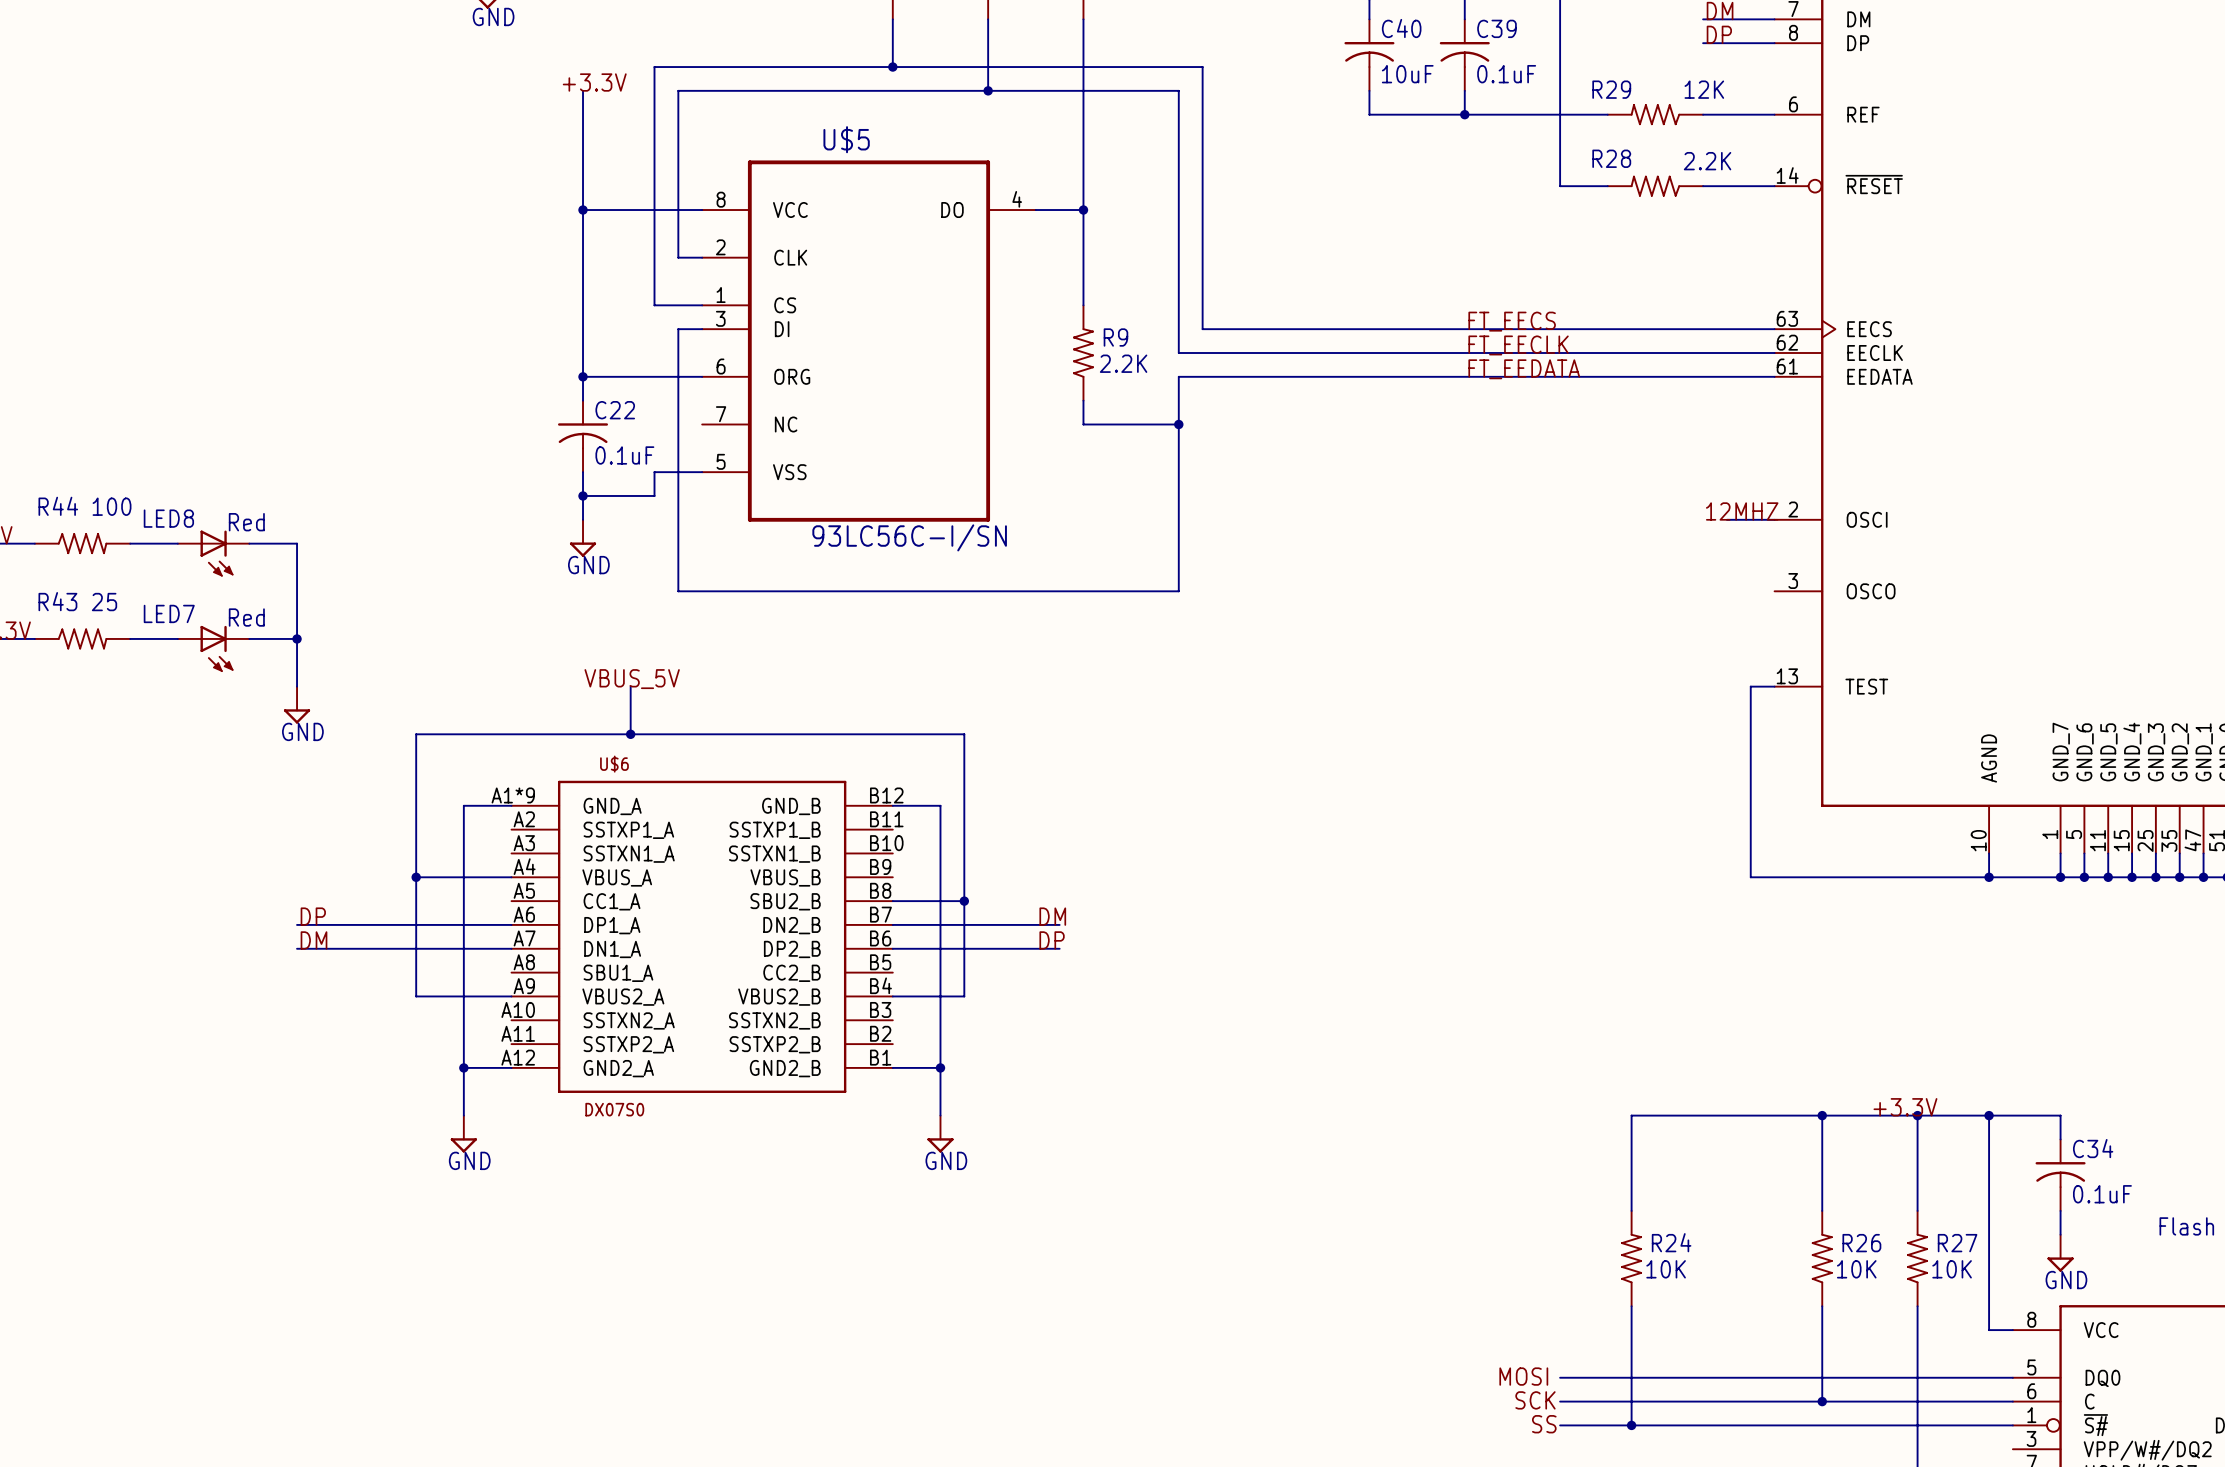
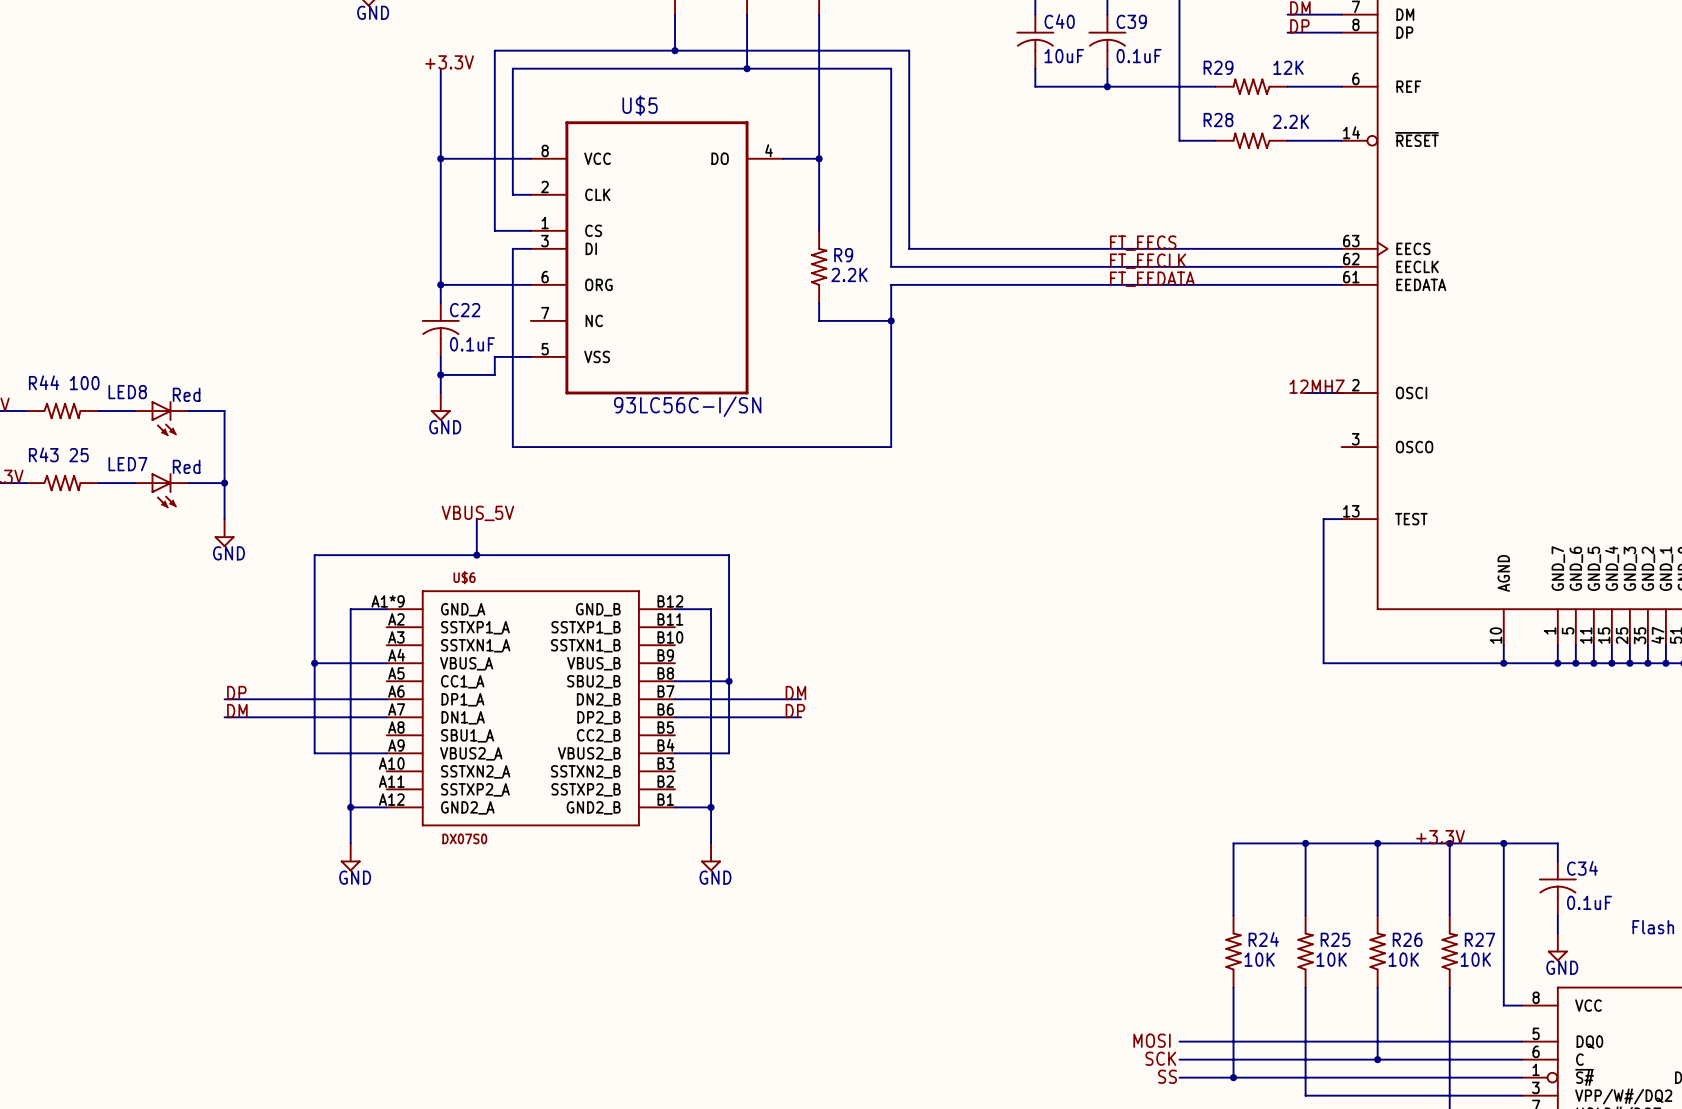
wire: none -> (1305, 843) (1305, 915)
junction: none -> (1305, 843)
R25: none -> 10K (1305, 951)
wire: none -> (1305, 987) (1305, 1095) (1521, 1095)

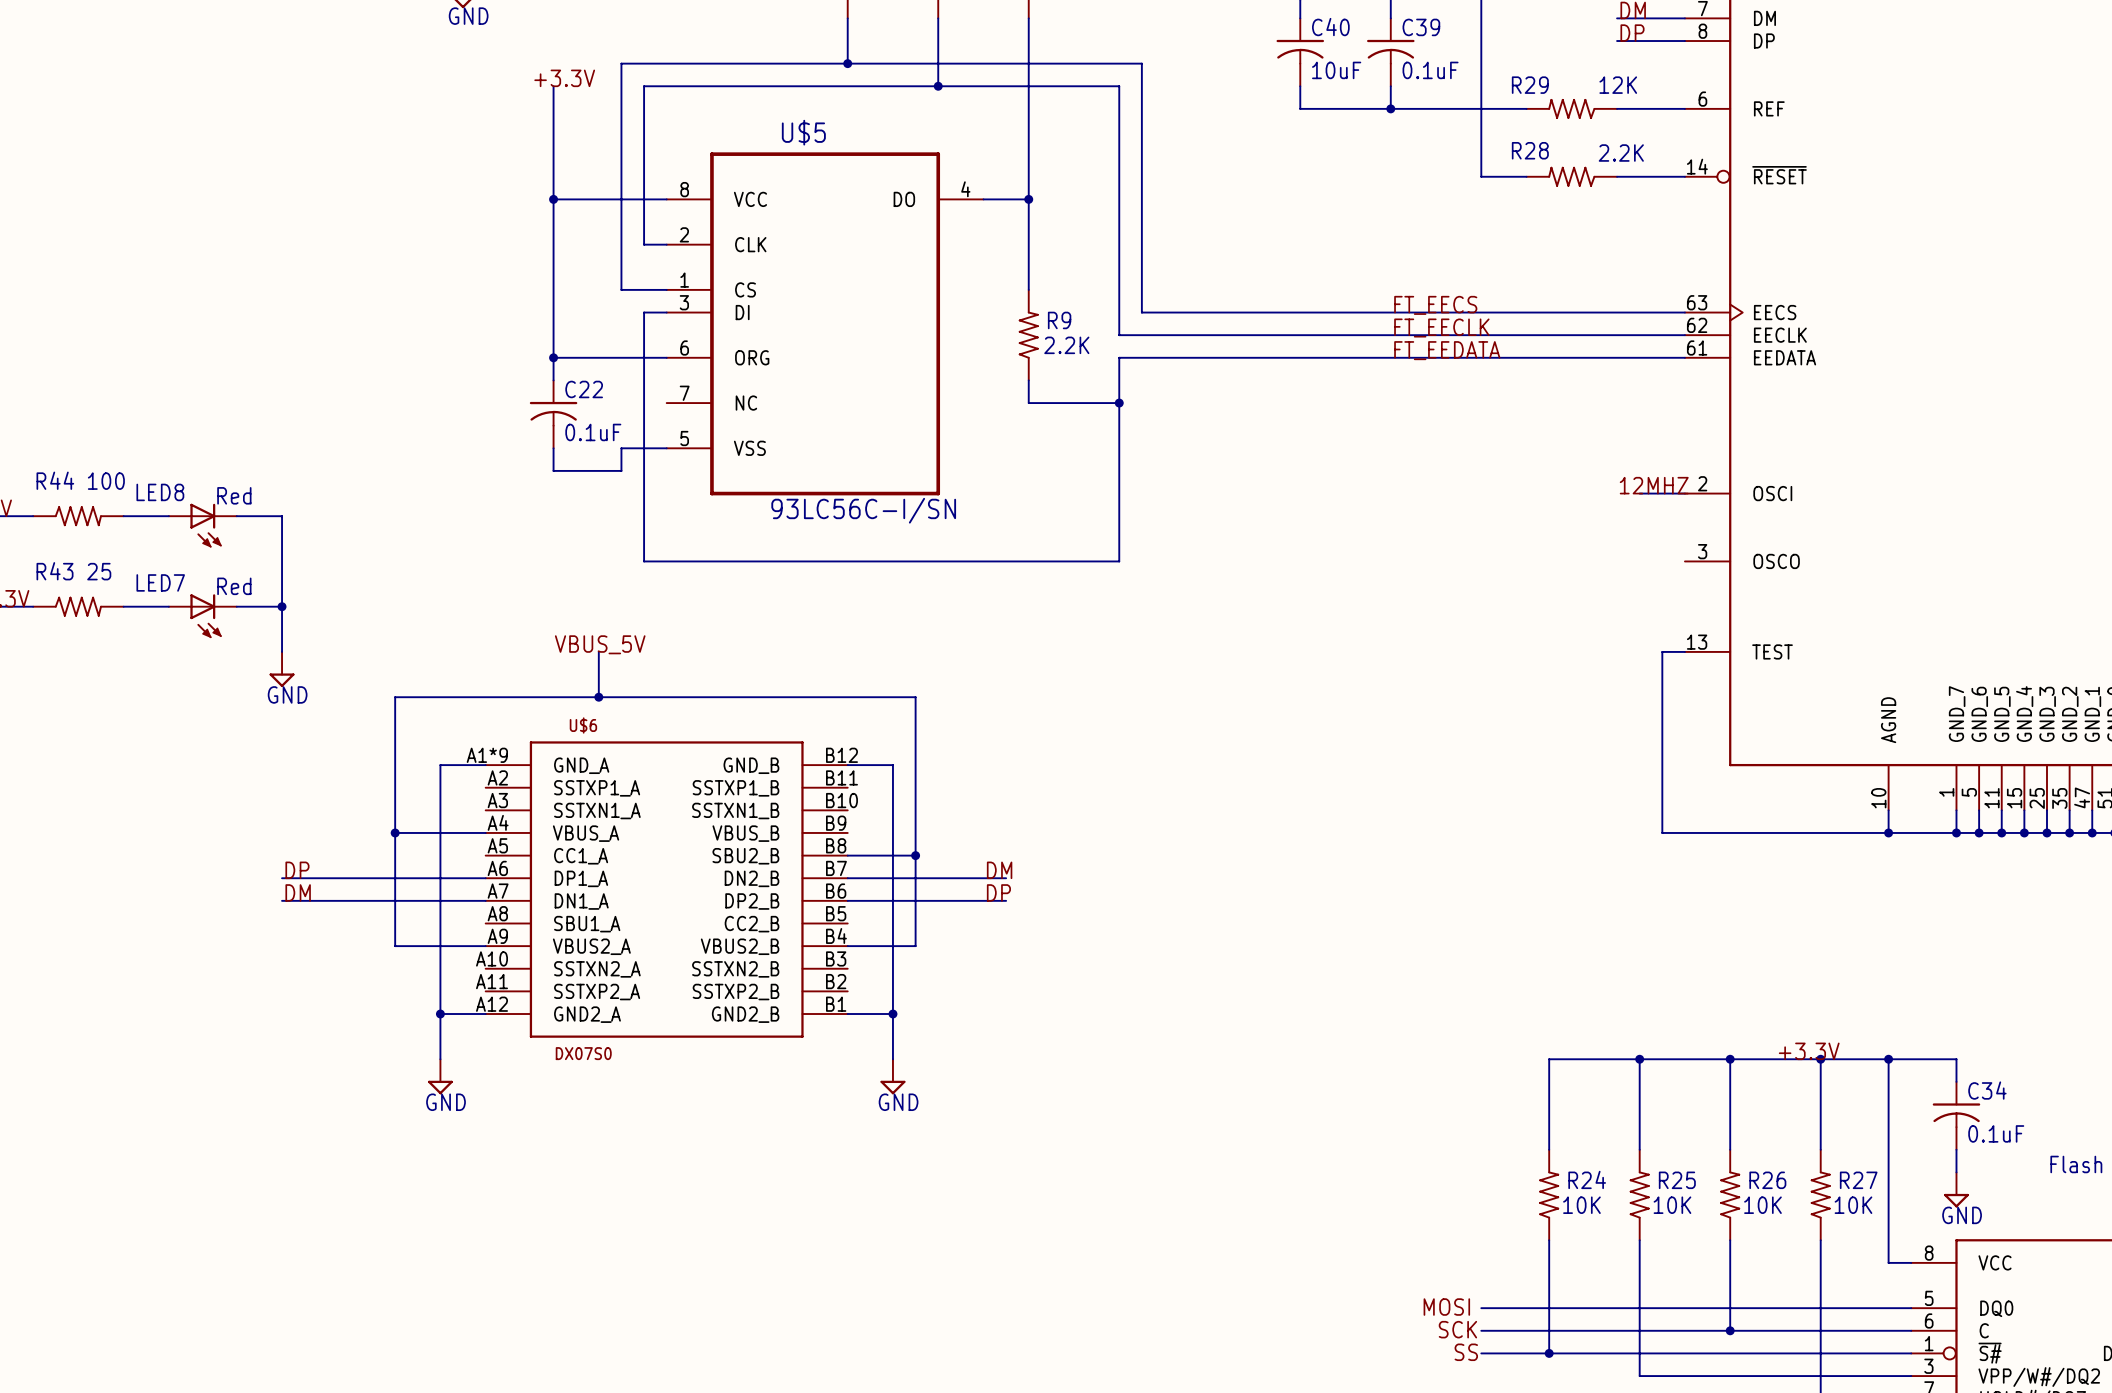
wire: (440, 374) (440, 392) -> none
junction: (440, 374) -> none
power symbol: GND (440, 406) -> none

